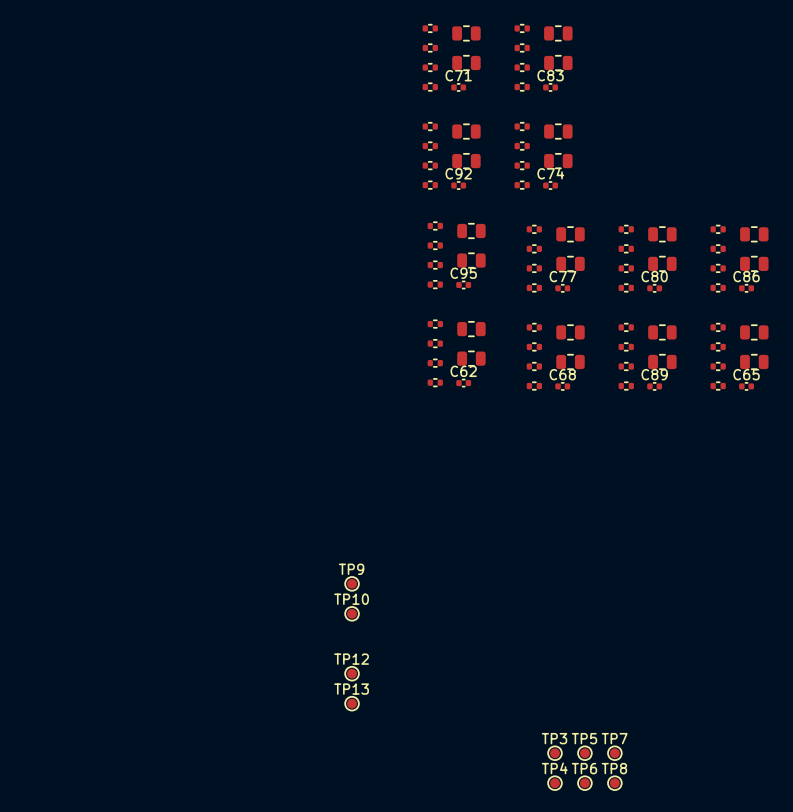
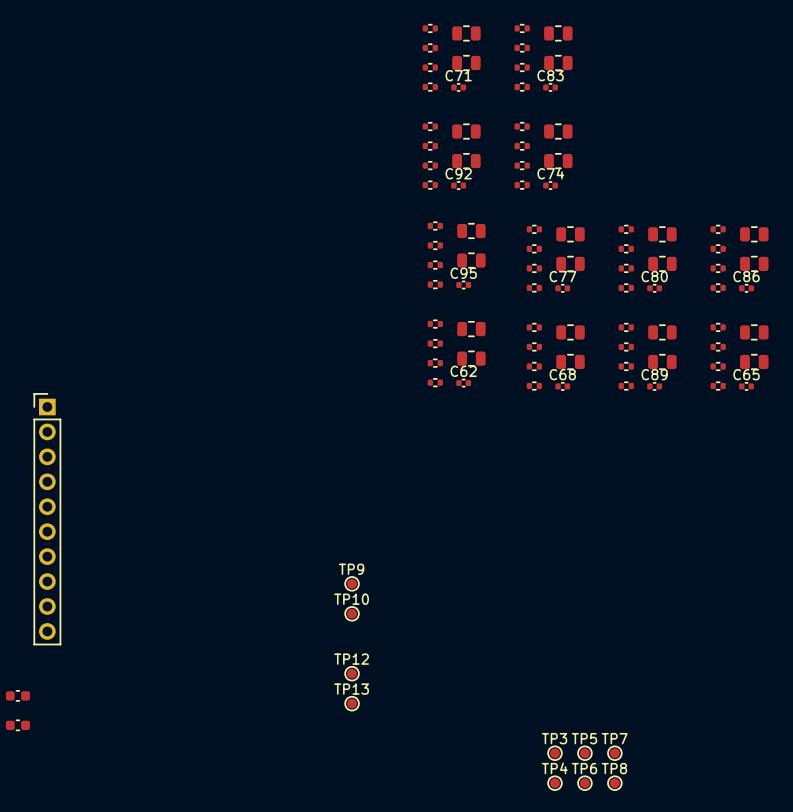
part: none -> (47, 519)
part: none -> (17, 695)
part: none -> (17, 725)

